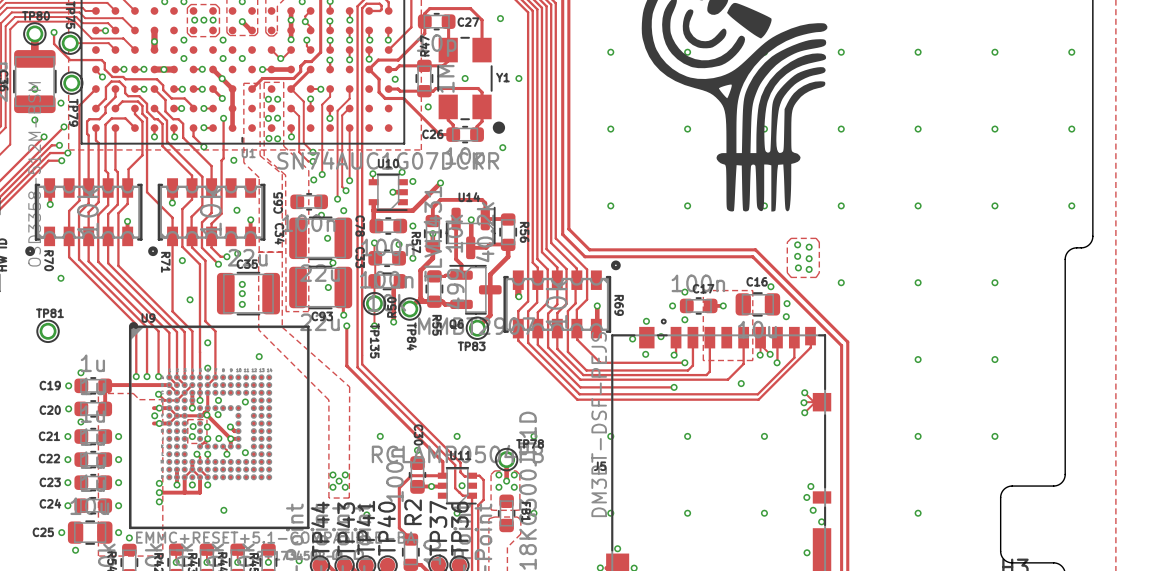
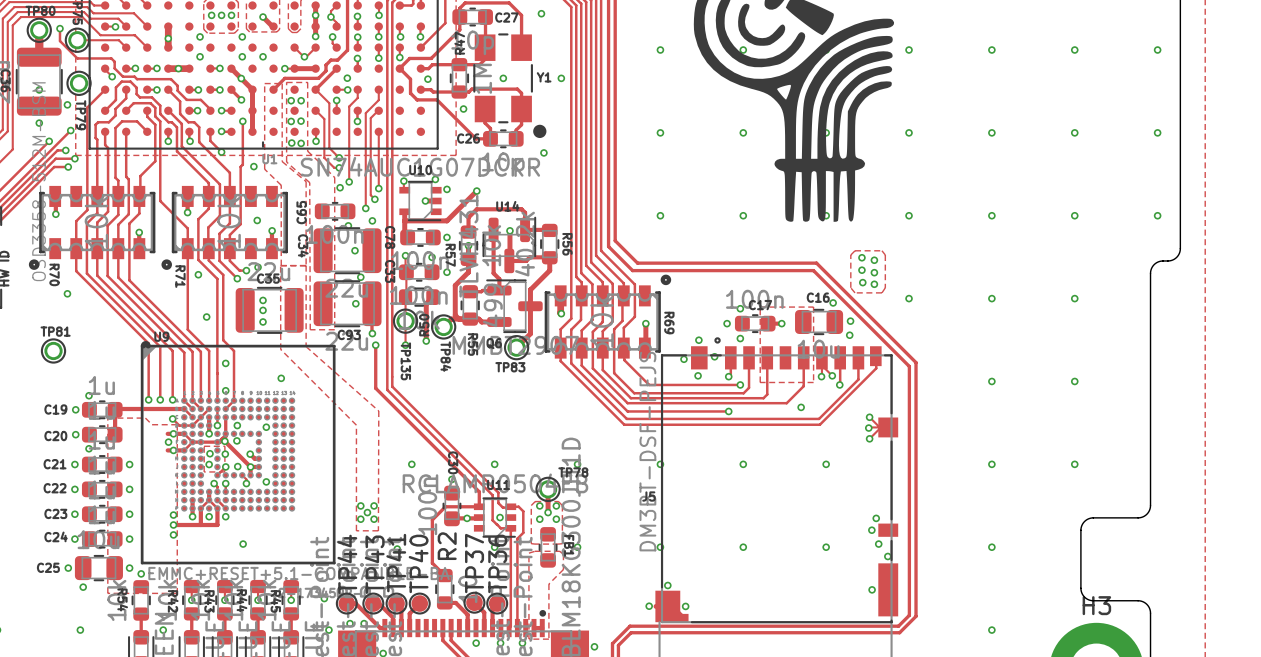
via: none -> (347, 78)

